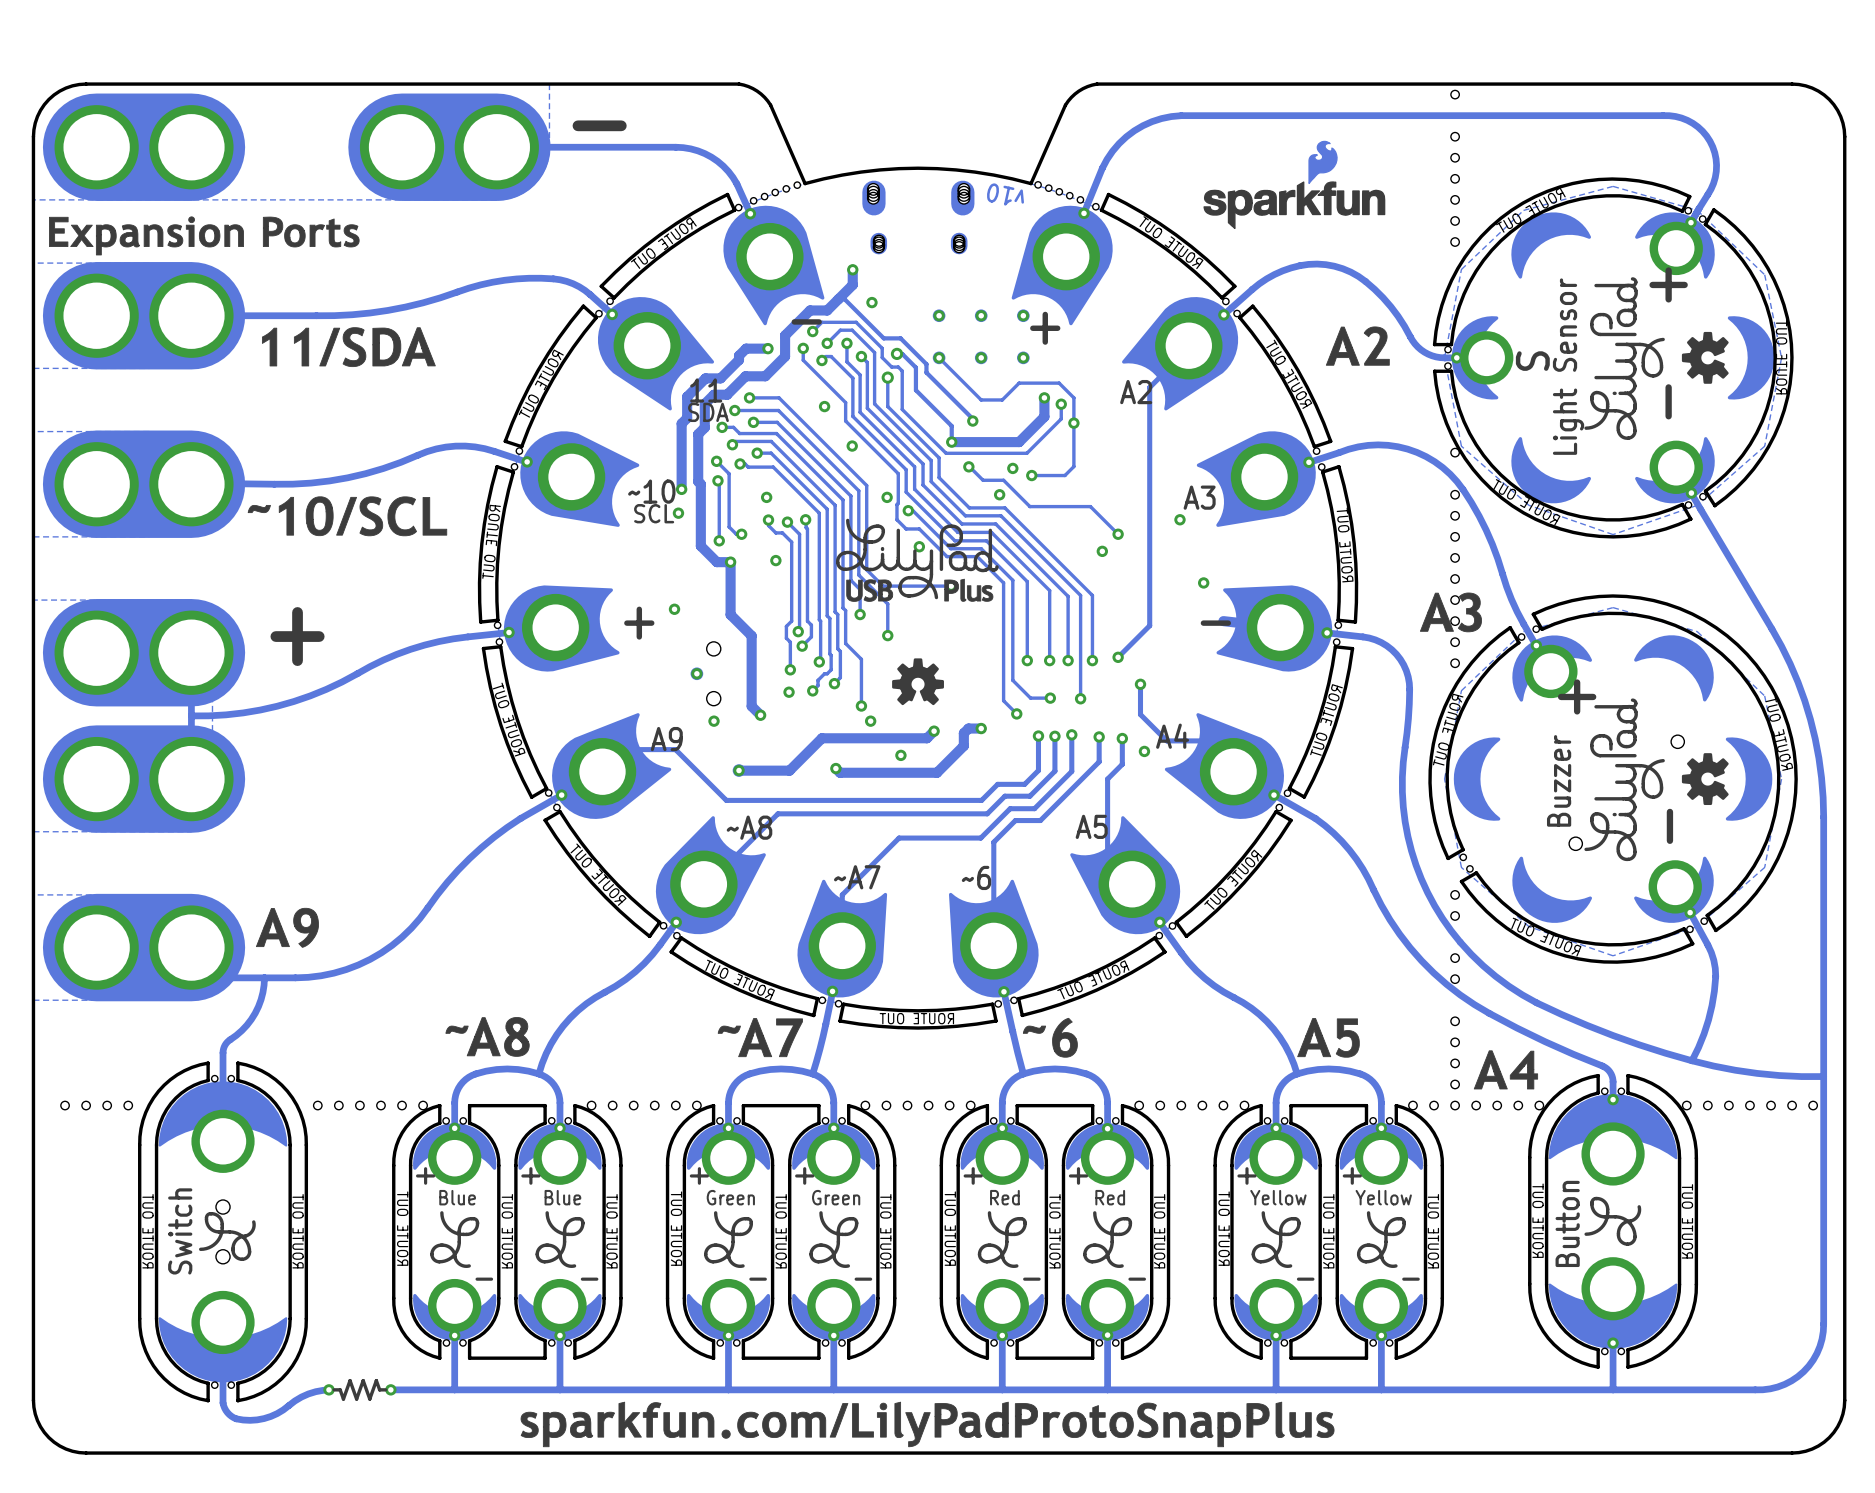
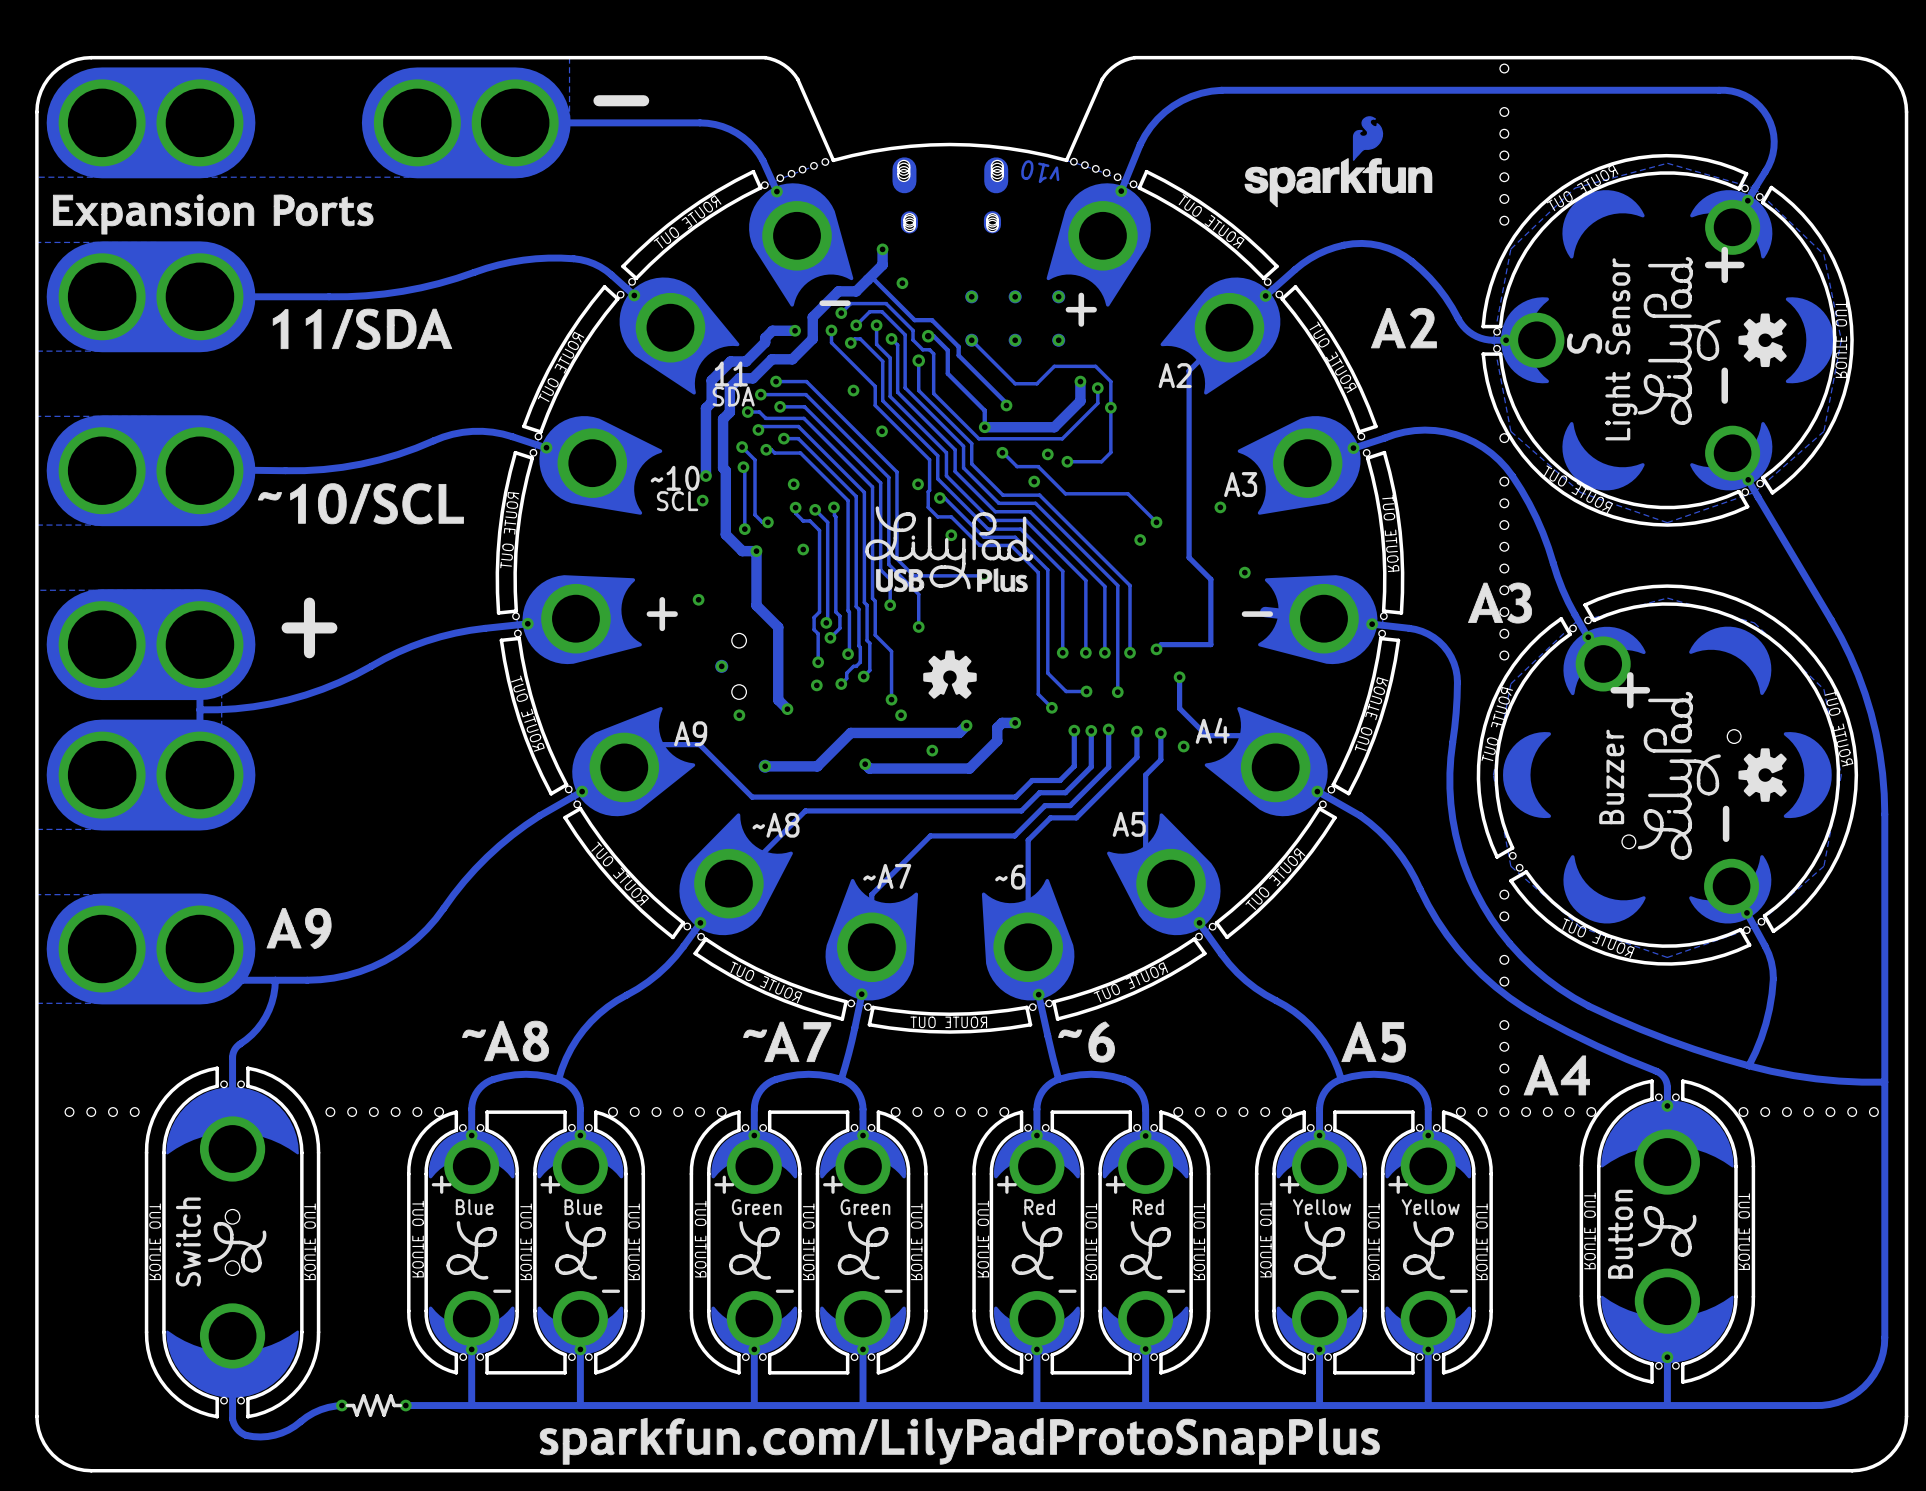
track: (1149, 568) (1149, 625) (1122, 652) -> (1189, 557) (1210, 579) (1210, 644) (1161, 644)

